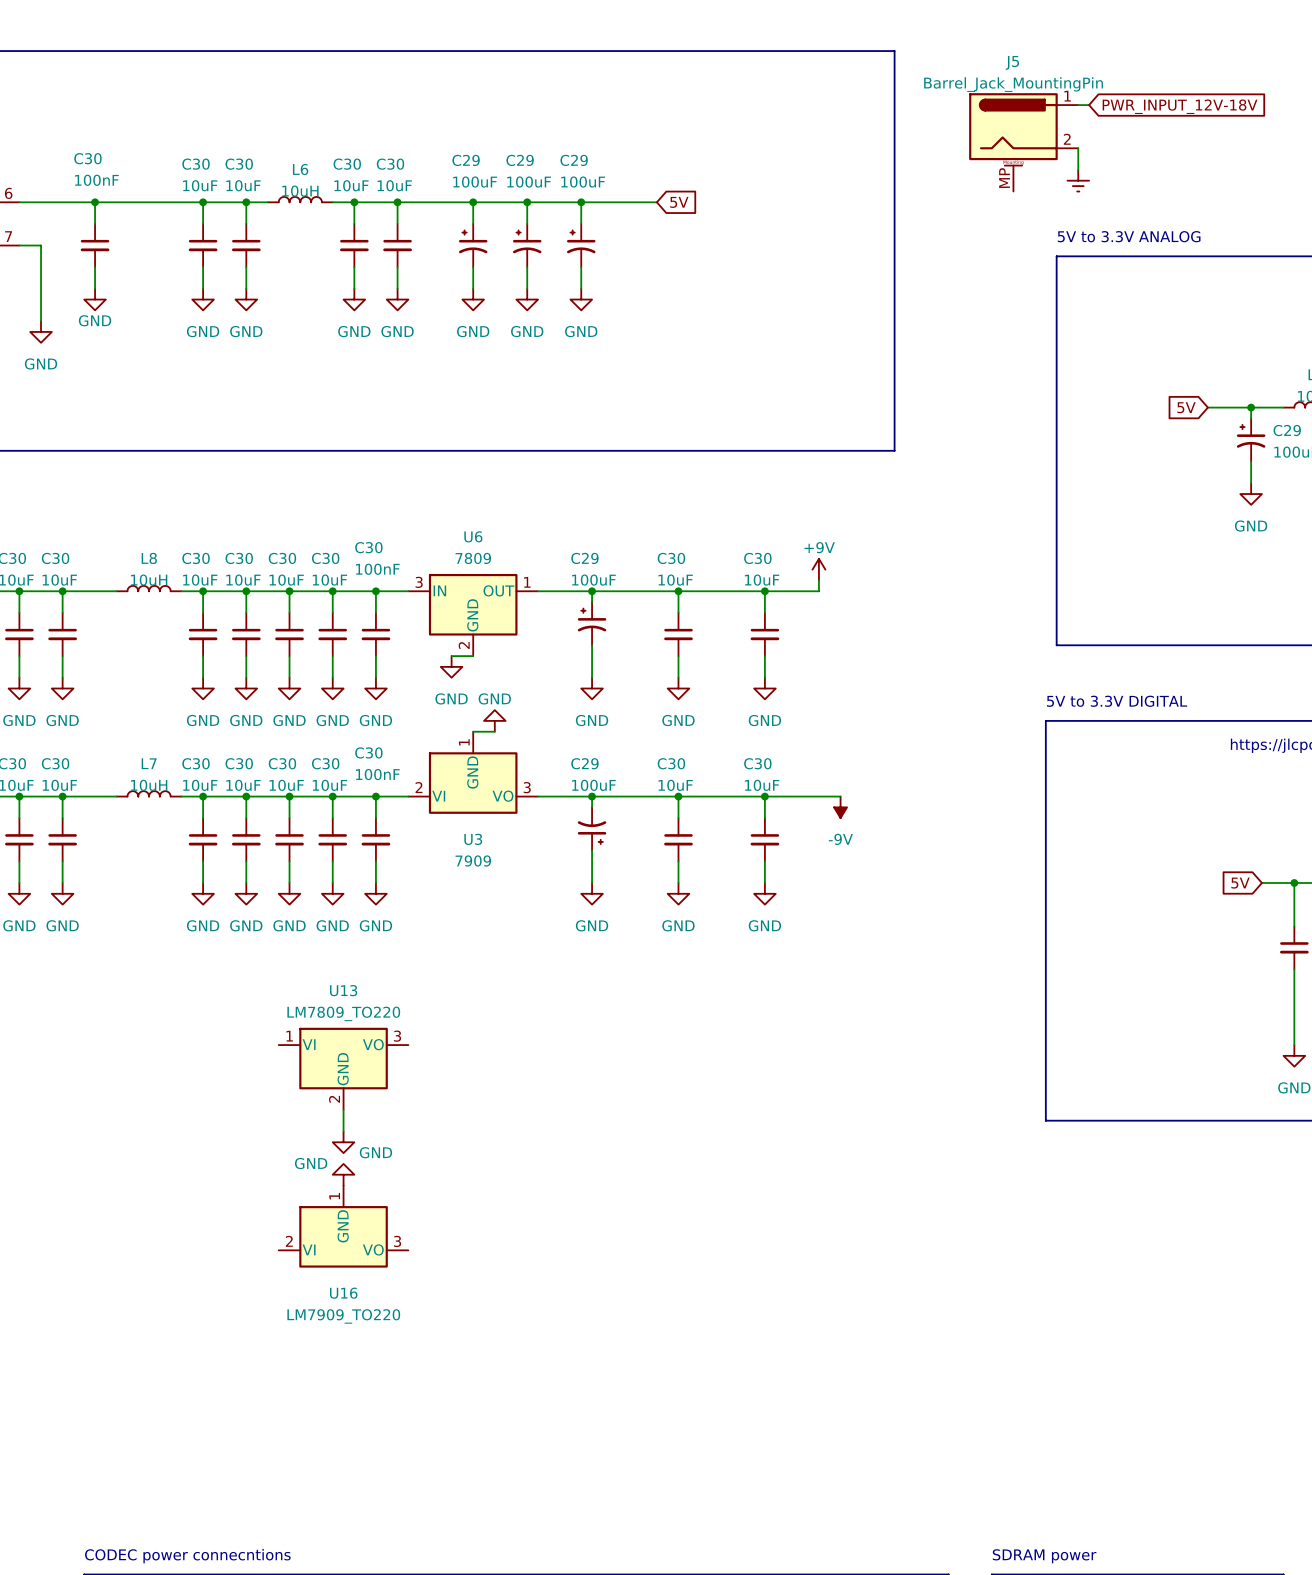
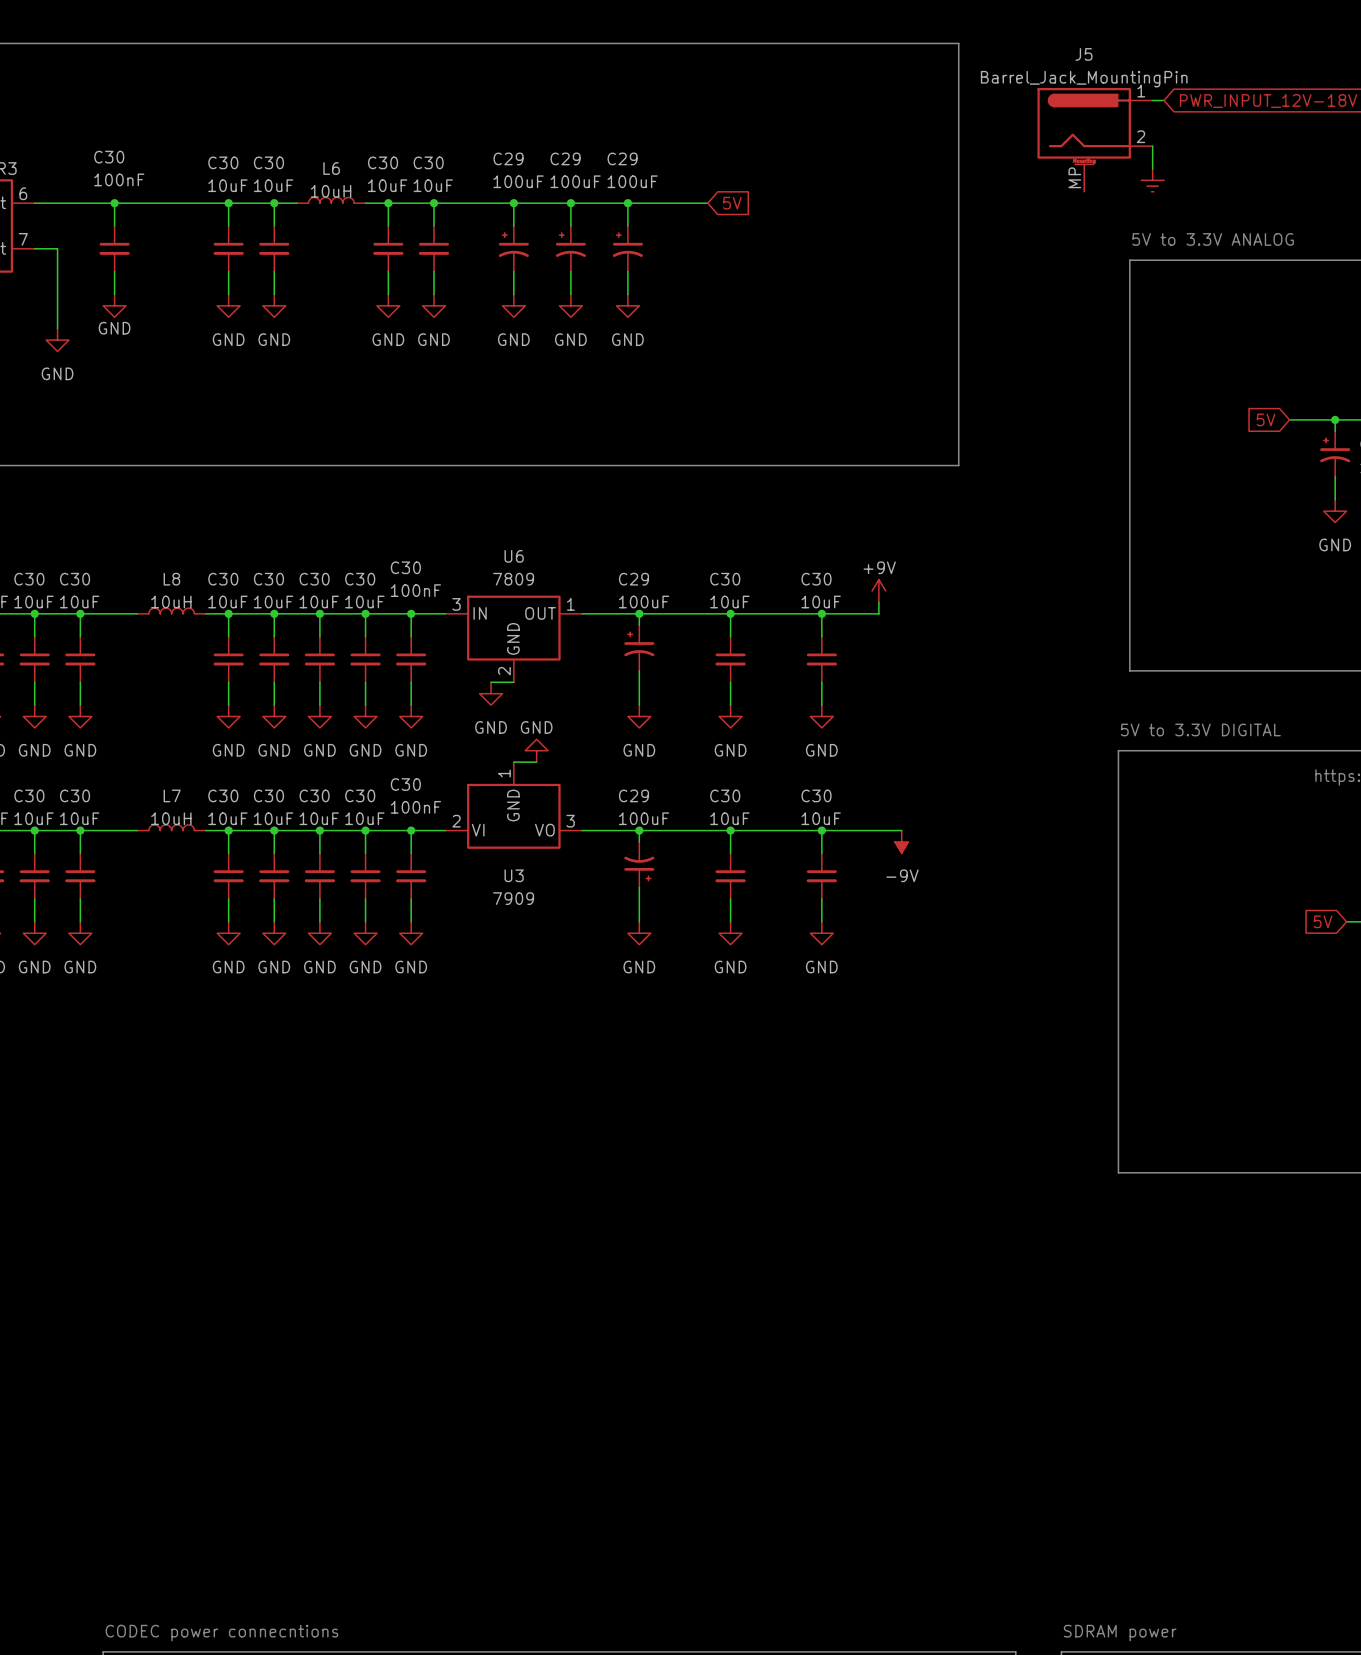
U13: LM7809_TO220 (343, 1068) -> none
wire: (343, 1109) (343, 1131) -> none
power symbol: GND (343, 1142) -> none
power symbol: GND (343, 1174) -> none
U16: LM7909_TO220 (343, 1226) -> none

